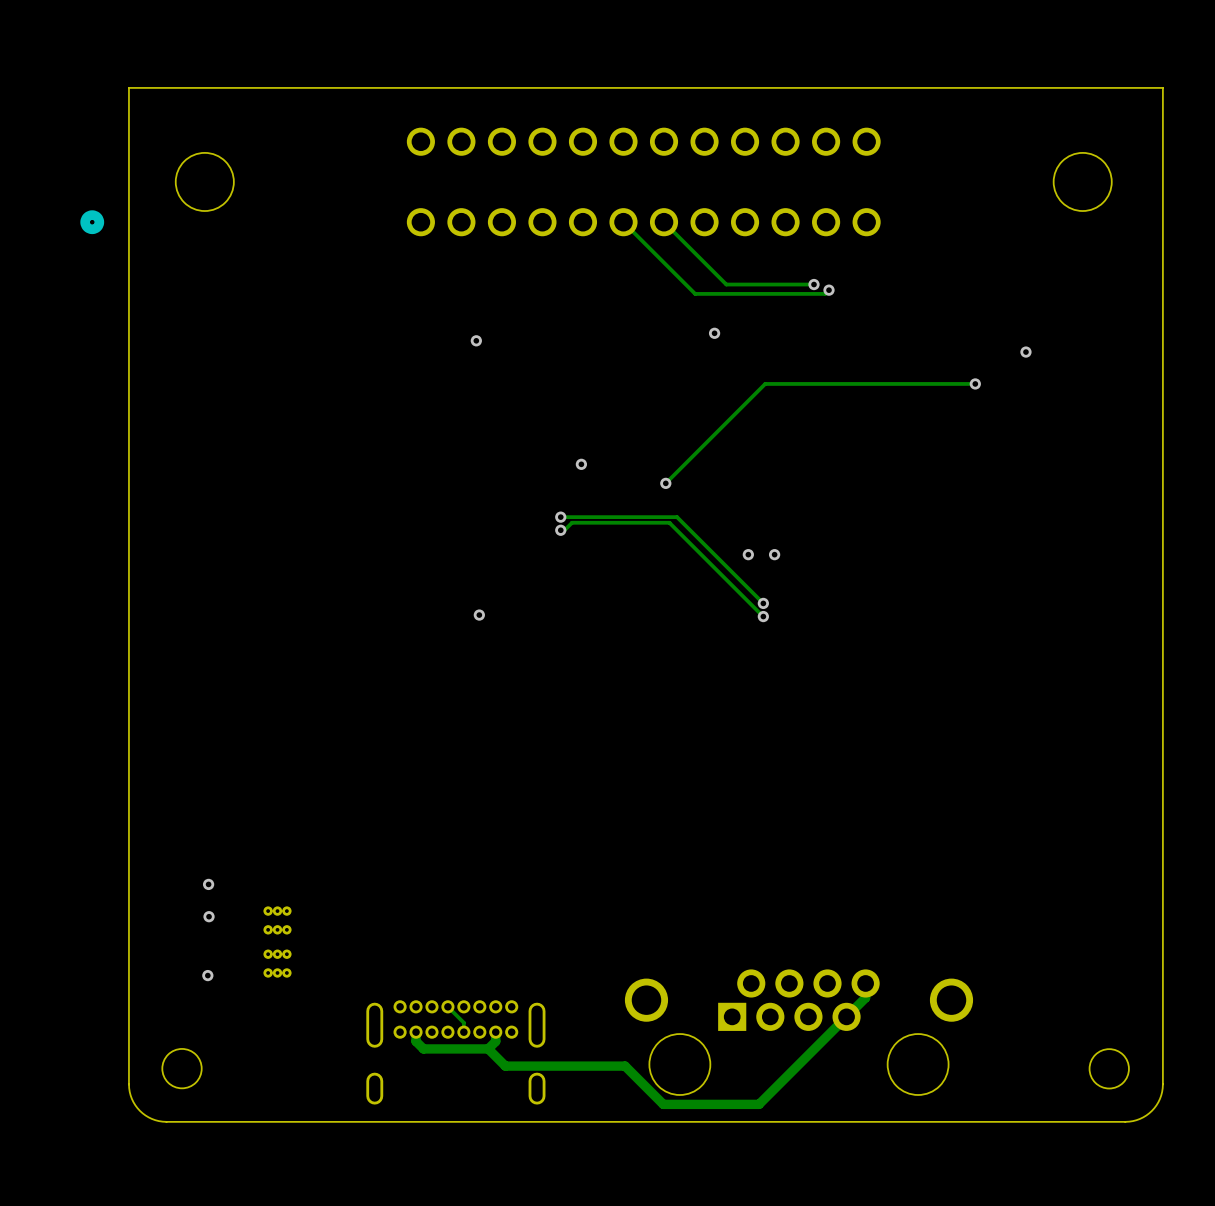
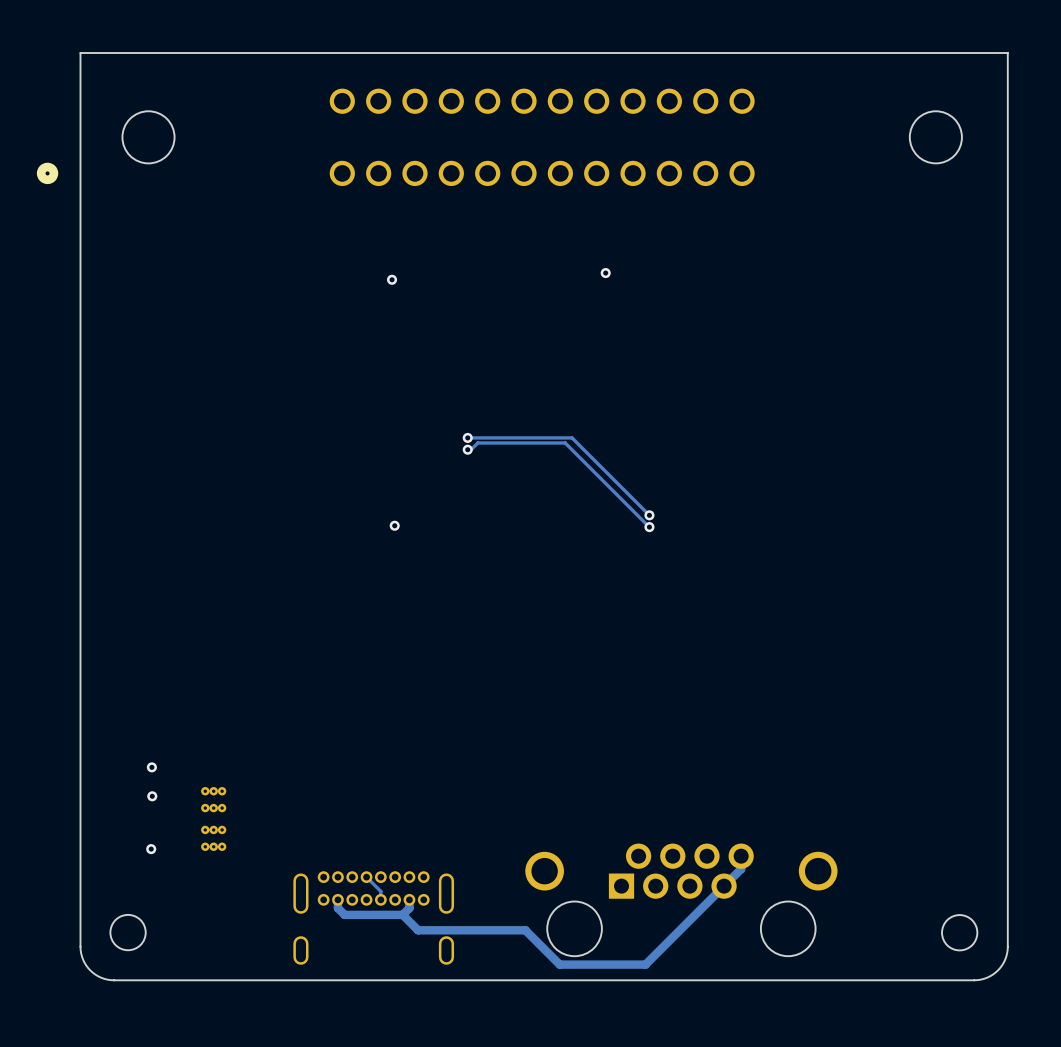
track: (623, 222) (695, 293) (825, 293) (829, 290) -> none
track: (664, 222) (726, 284) (813, 284) -> none
via: (813, 284) -> none
via: (829, 290) -> none
via: (1025, 352) -> none
track: (975, 383) (765, 383) (665, 483) -> none
via: (975, 383) -> none
via: (581, 464) -> none
via: (665, 483) -> none
via: (748, 554) -> none
via: (774, 554) -> none

